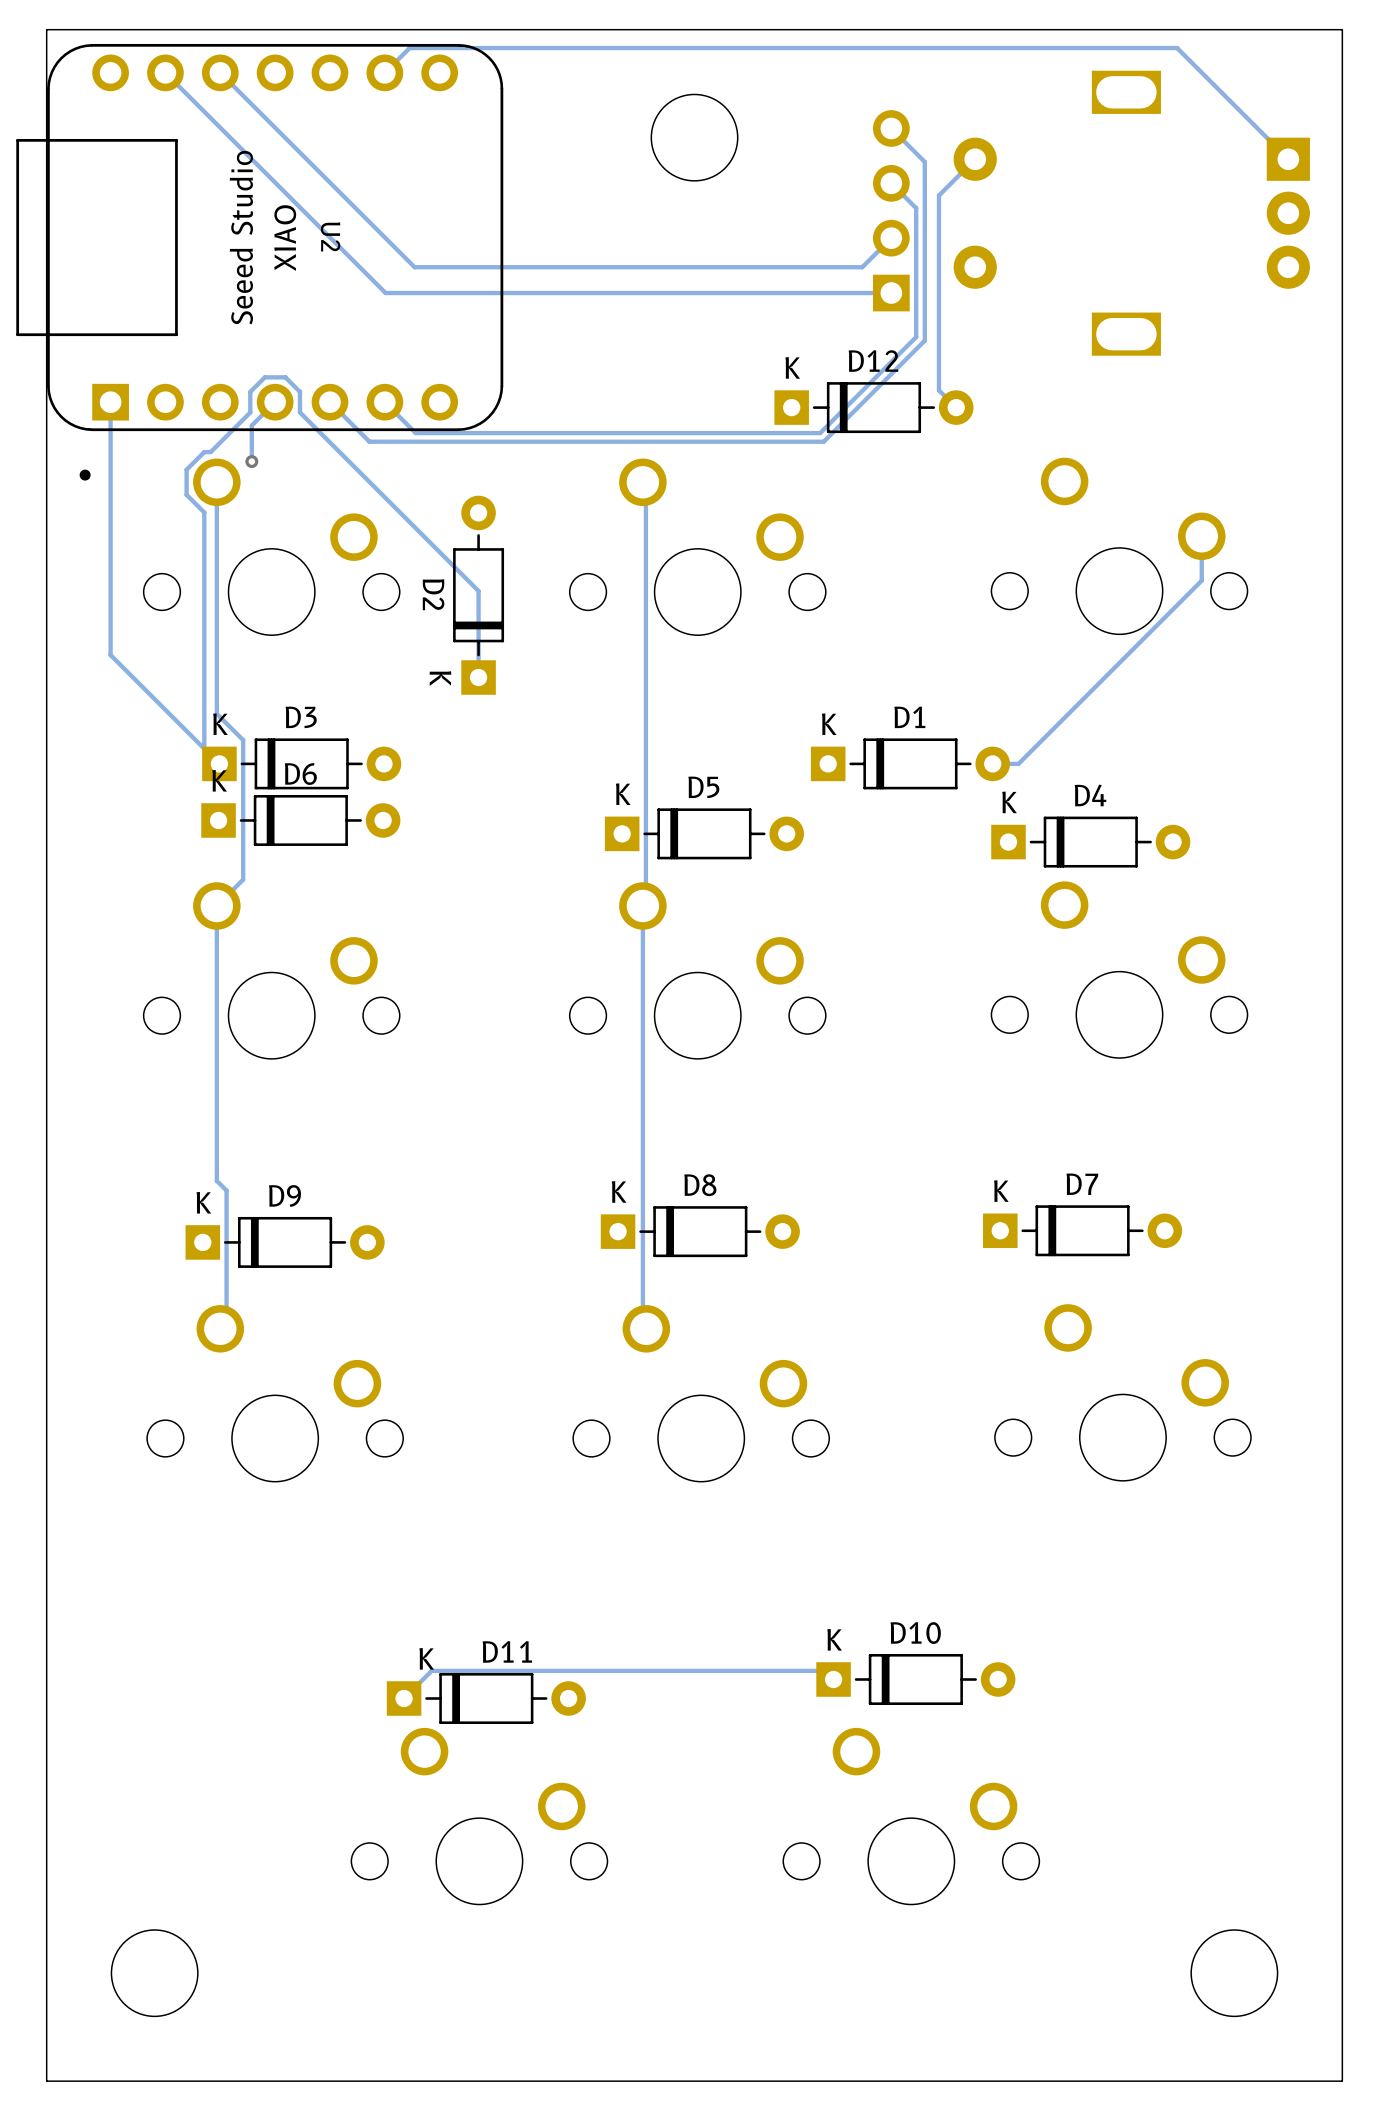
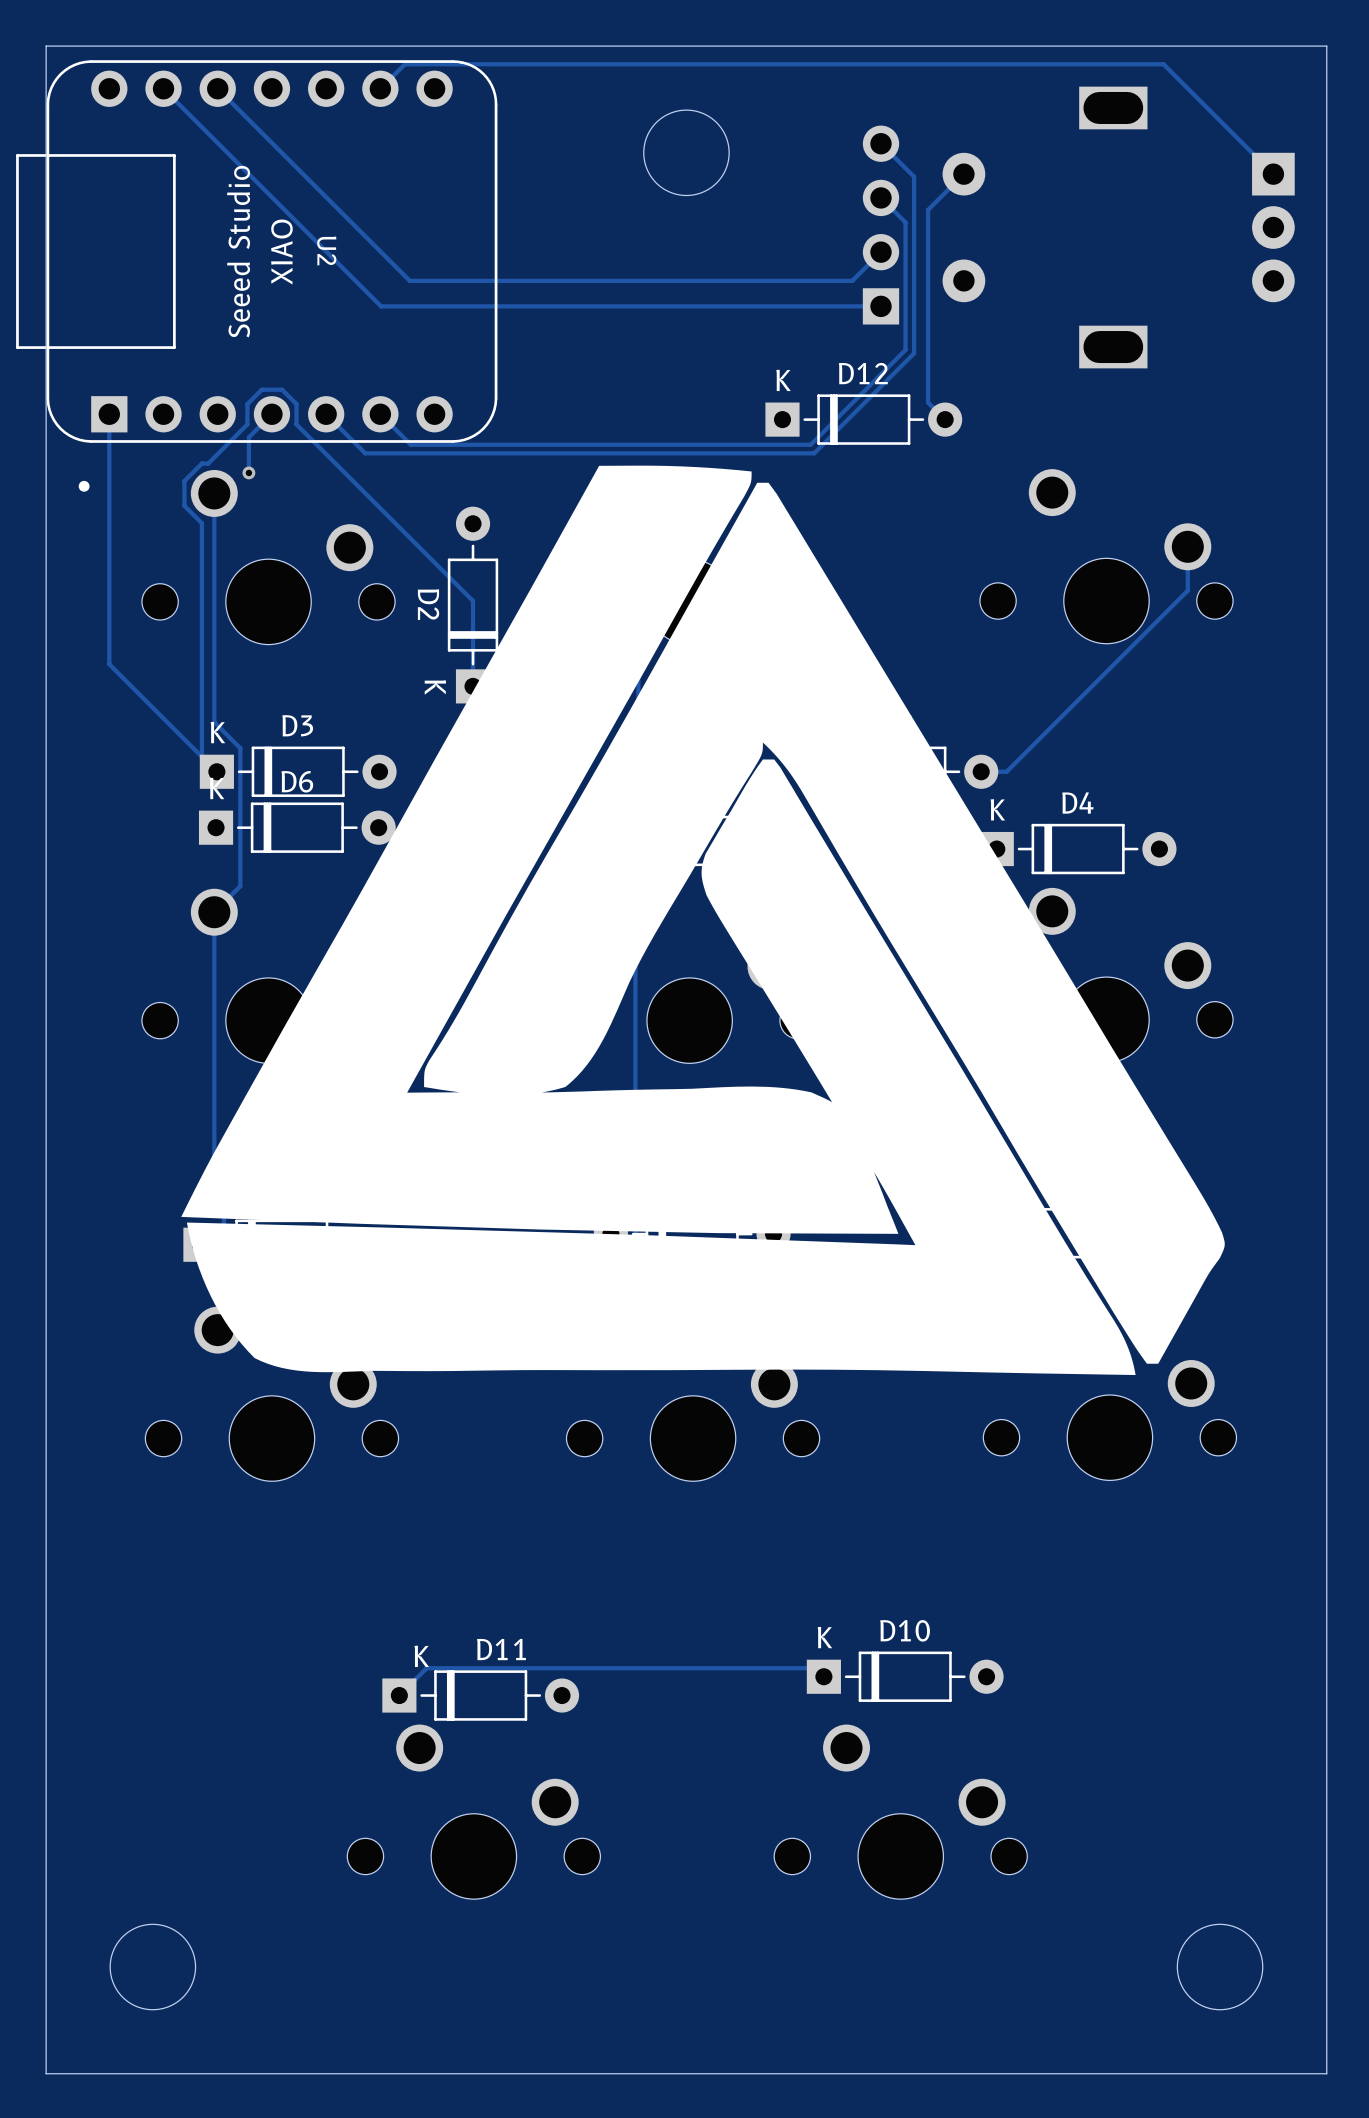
drawing: none -> [181, 465, 1225, 1376]

